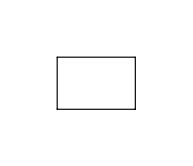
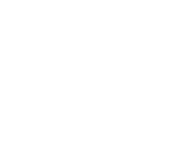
line: (57, 57) (135, 57) (135, 109) (57, 109) (57, 57) -> none

